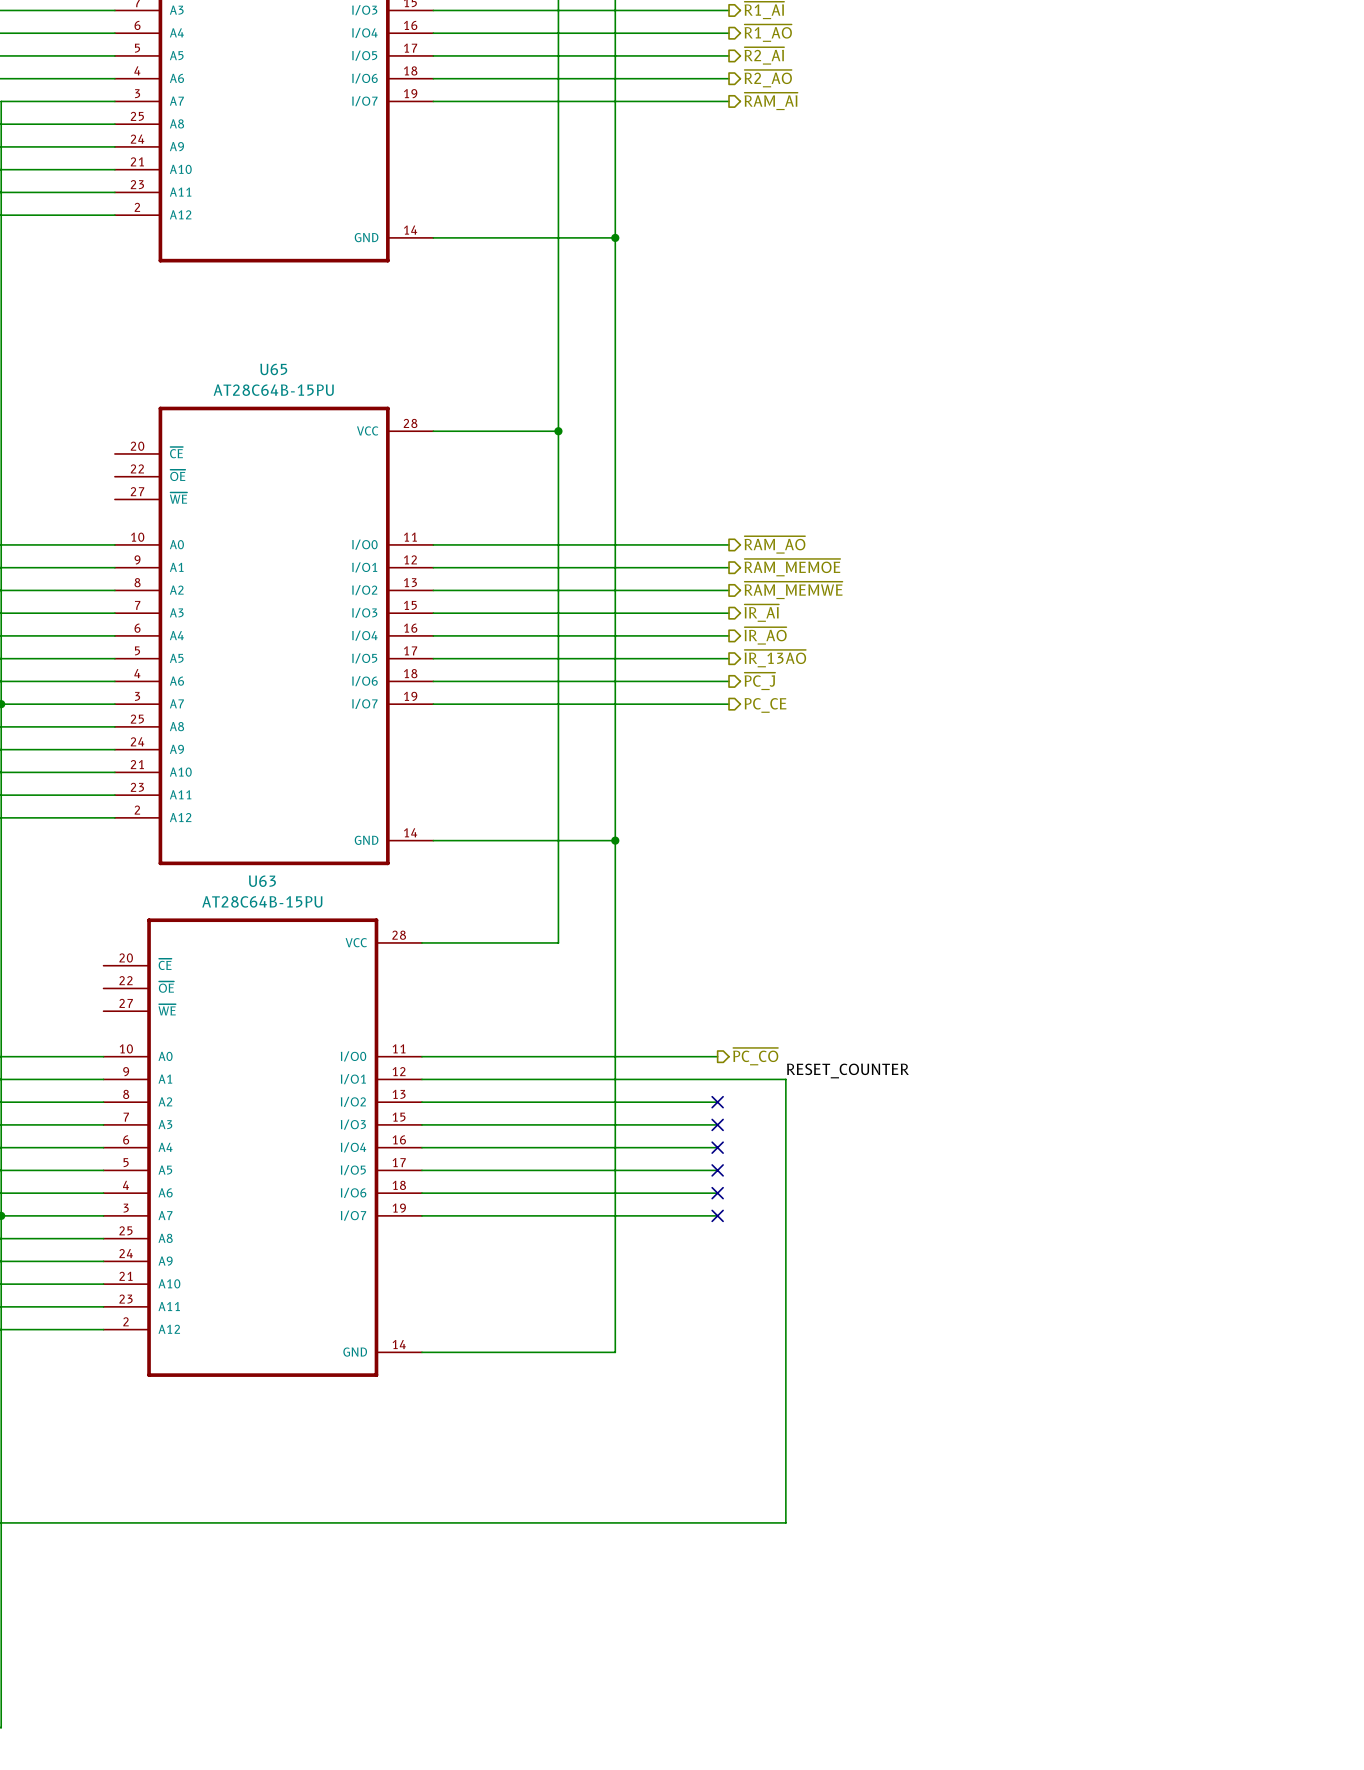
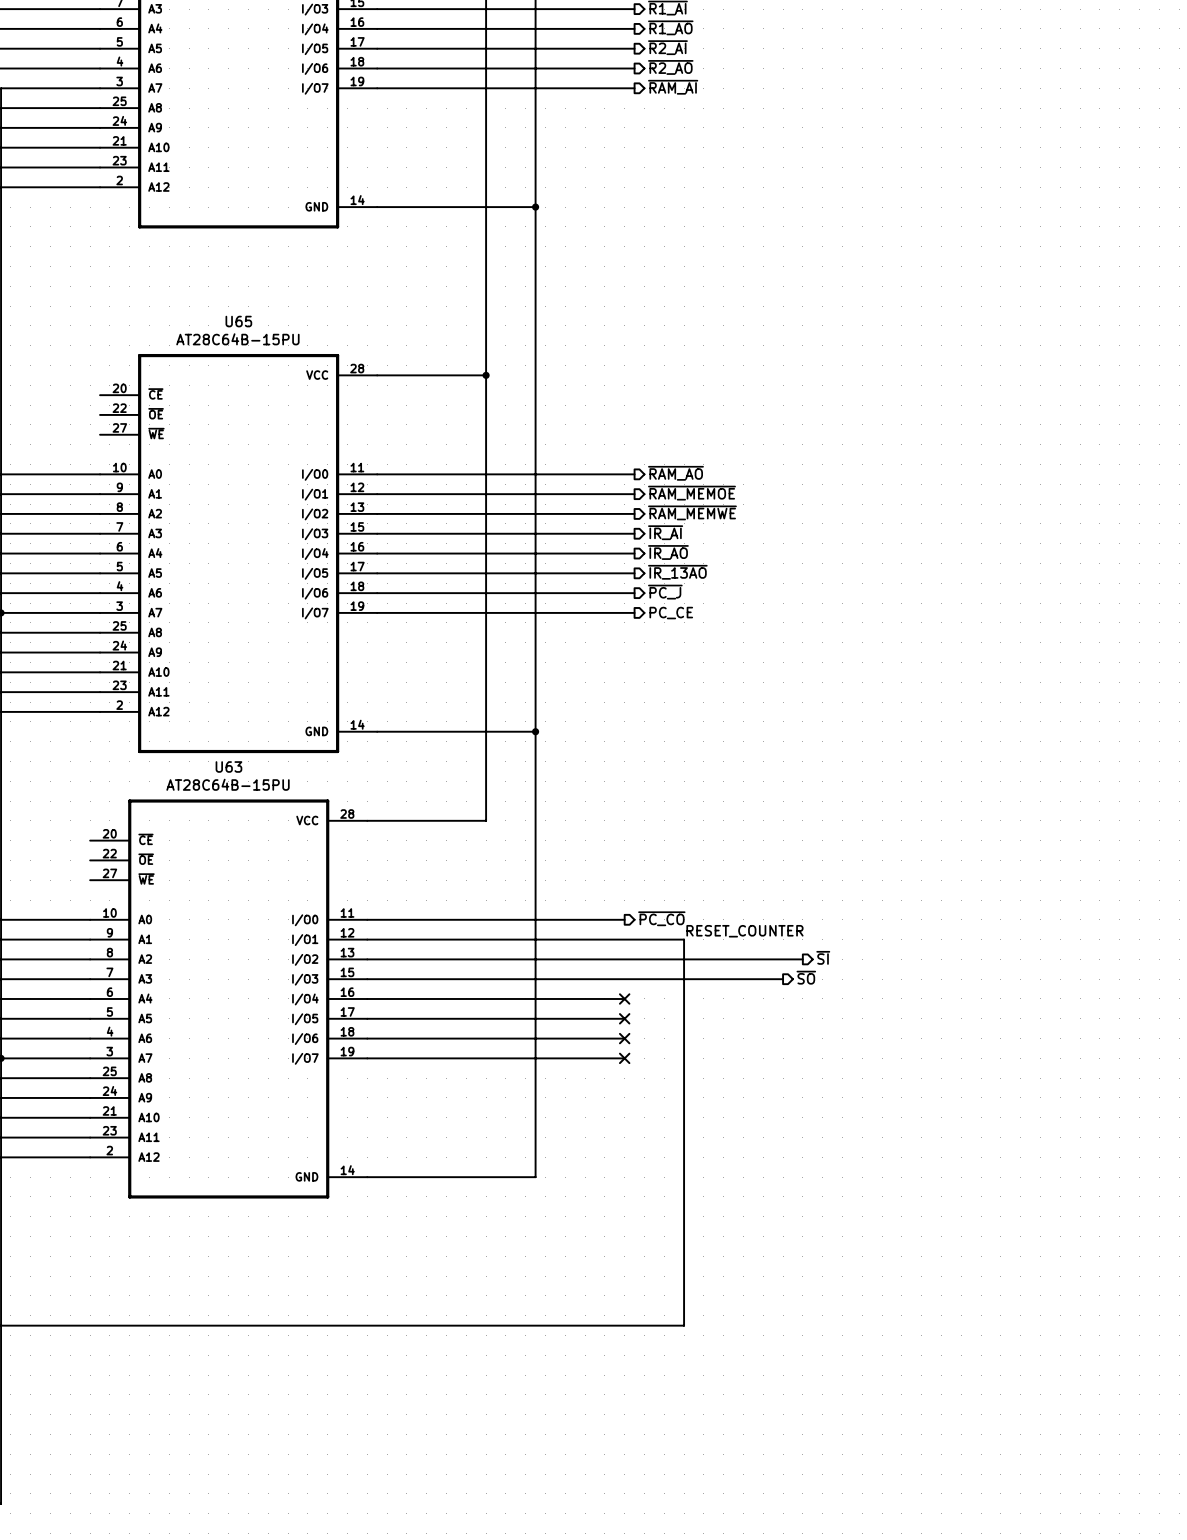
hierarchical label: none -> ~{SI} (823, 957)
wire: none -> (624, 959) (802, 959)
no-connect mark: (717, 1102) -> none
hierarchical label: none -> ~{SO} (806, 977)
wire: none -> (624, 979) (783, 979)
no-connect mark: (717, 1124) -> none

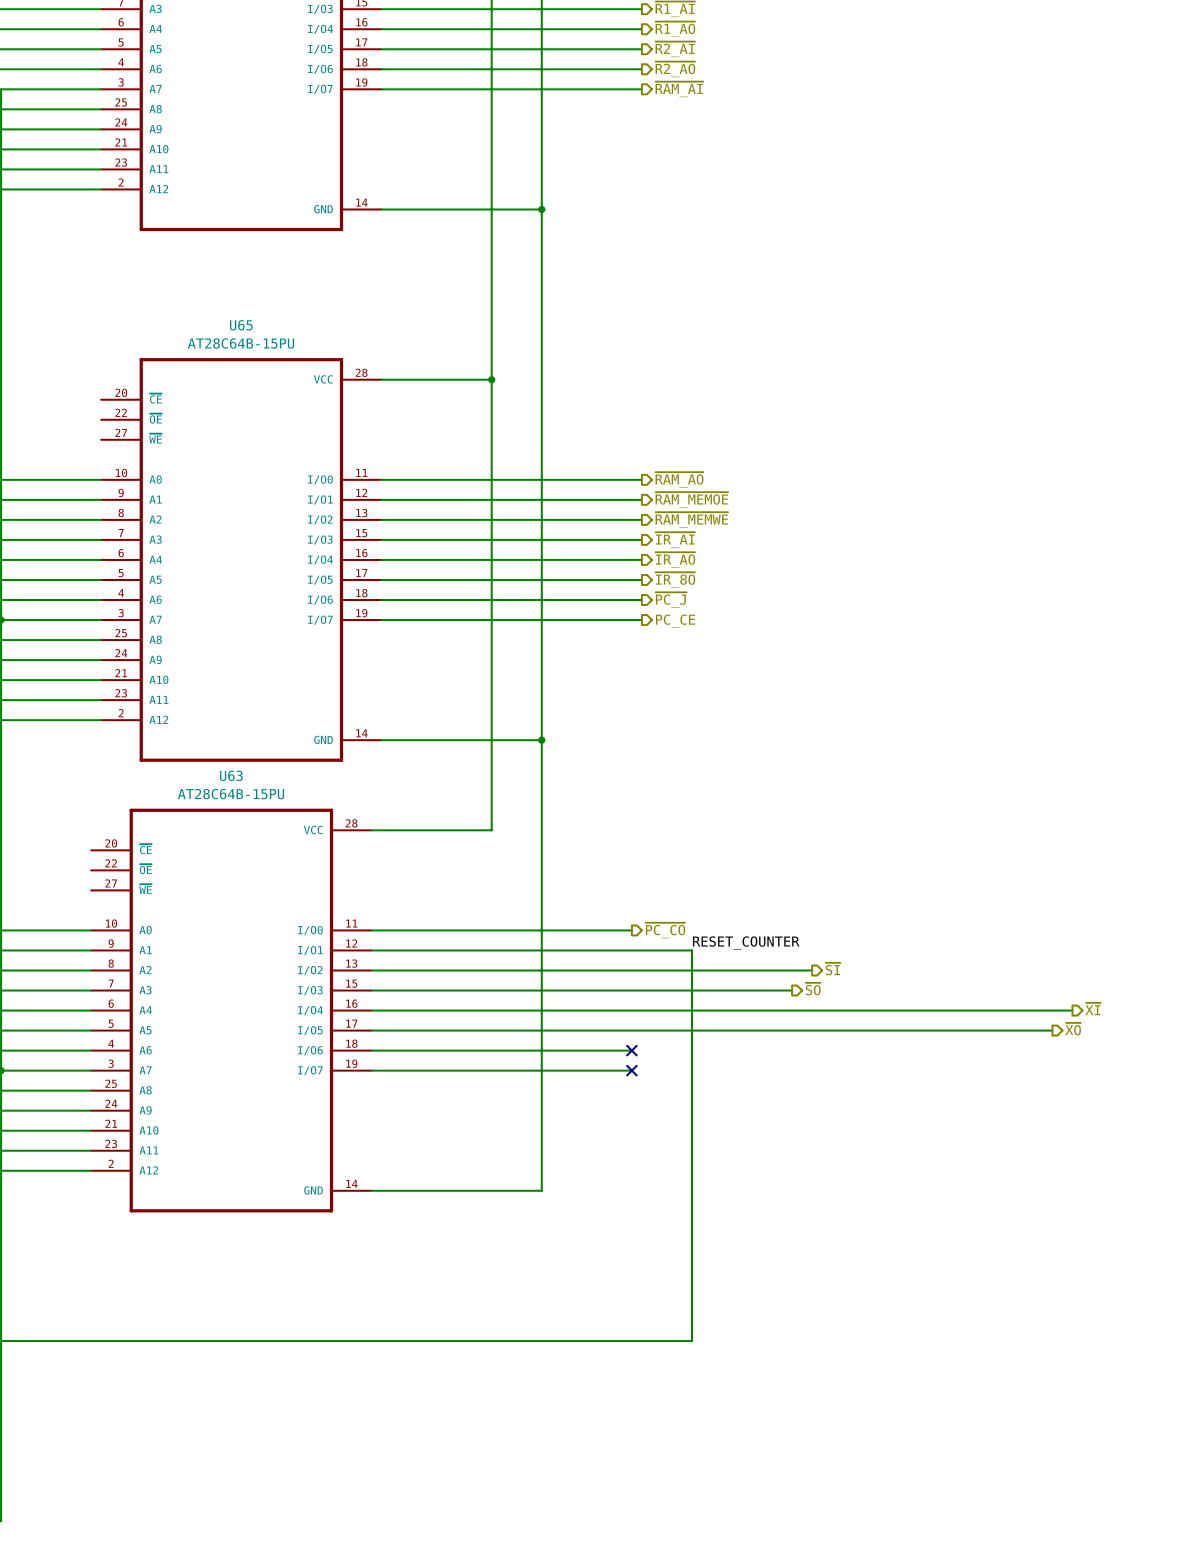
hierarchical label: ~{IR_13AO} (677, 572) -> ~{IR_8O} (675, 580)
hierarchical label: none -> ~{XI} (1093, 1009)
wire: none -> (631, 1010) (1072, 1010)
no-connect mark: (624, 998) -> none
hierarchical label: none -> ~{XO} (1073, 1029)
wire: none -> (631, 1030) (1052, 1030)
no-connect mark: (624, 1018) -> none

